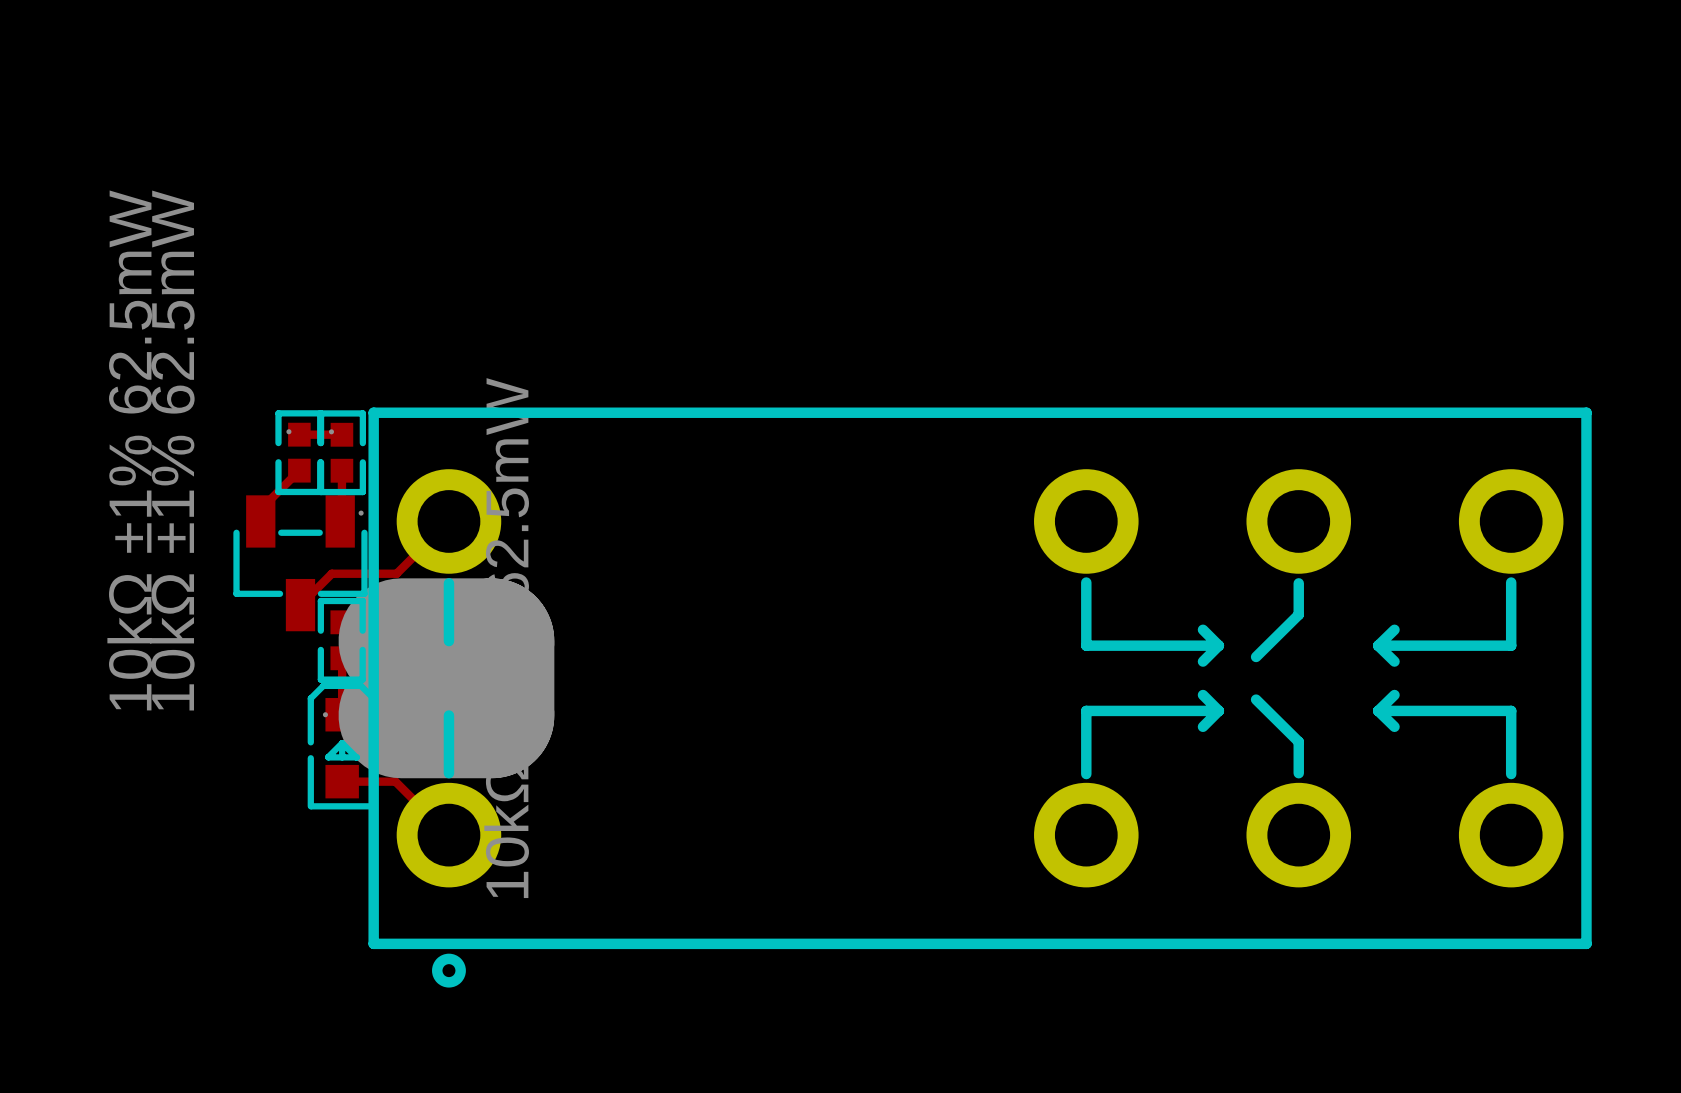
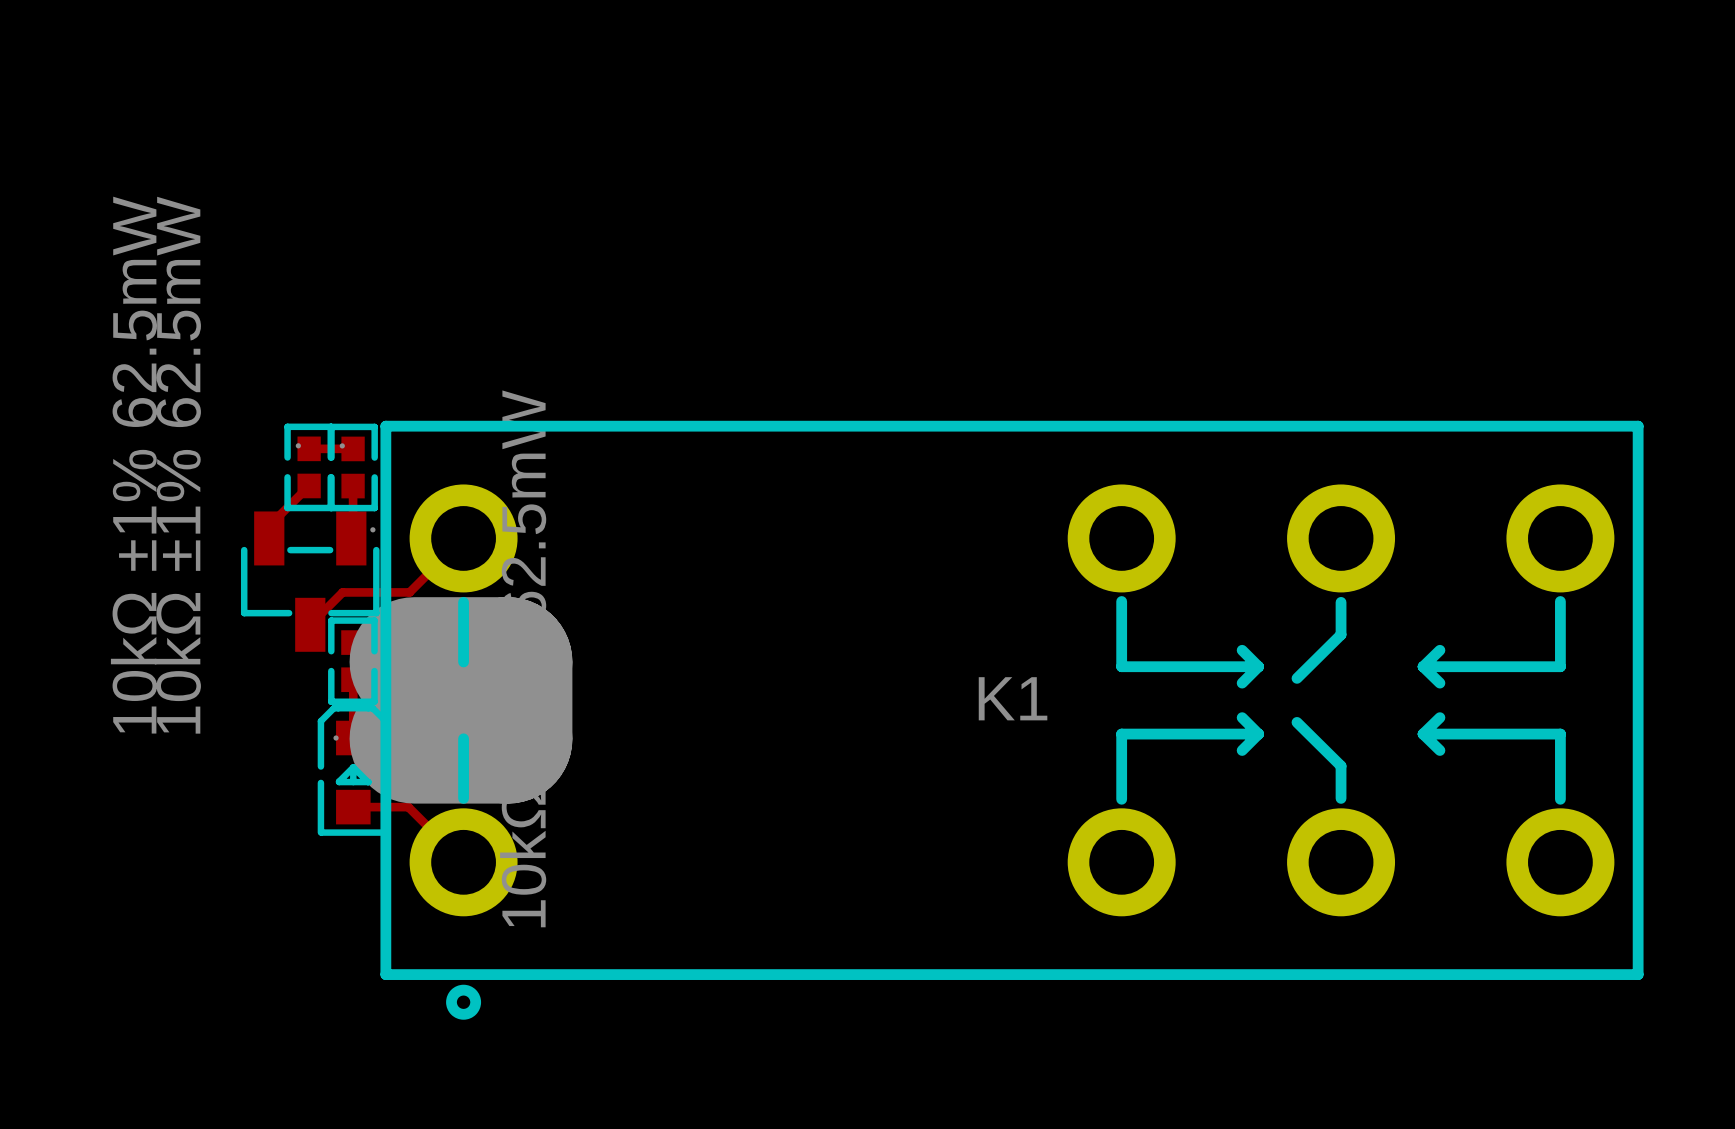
K1 name: none -> K1 (1013, 698)

